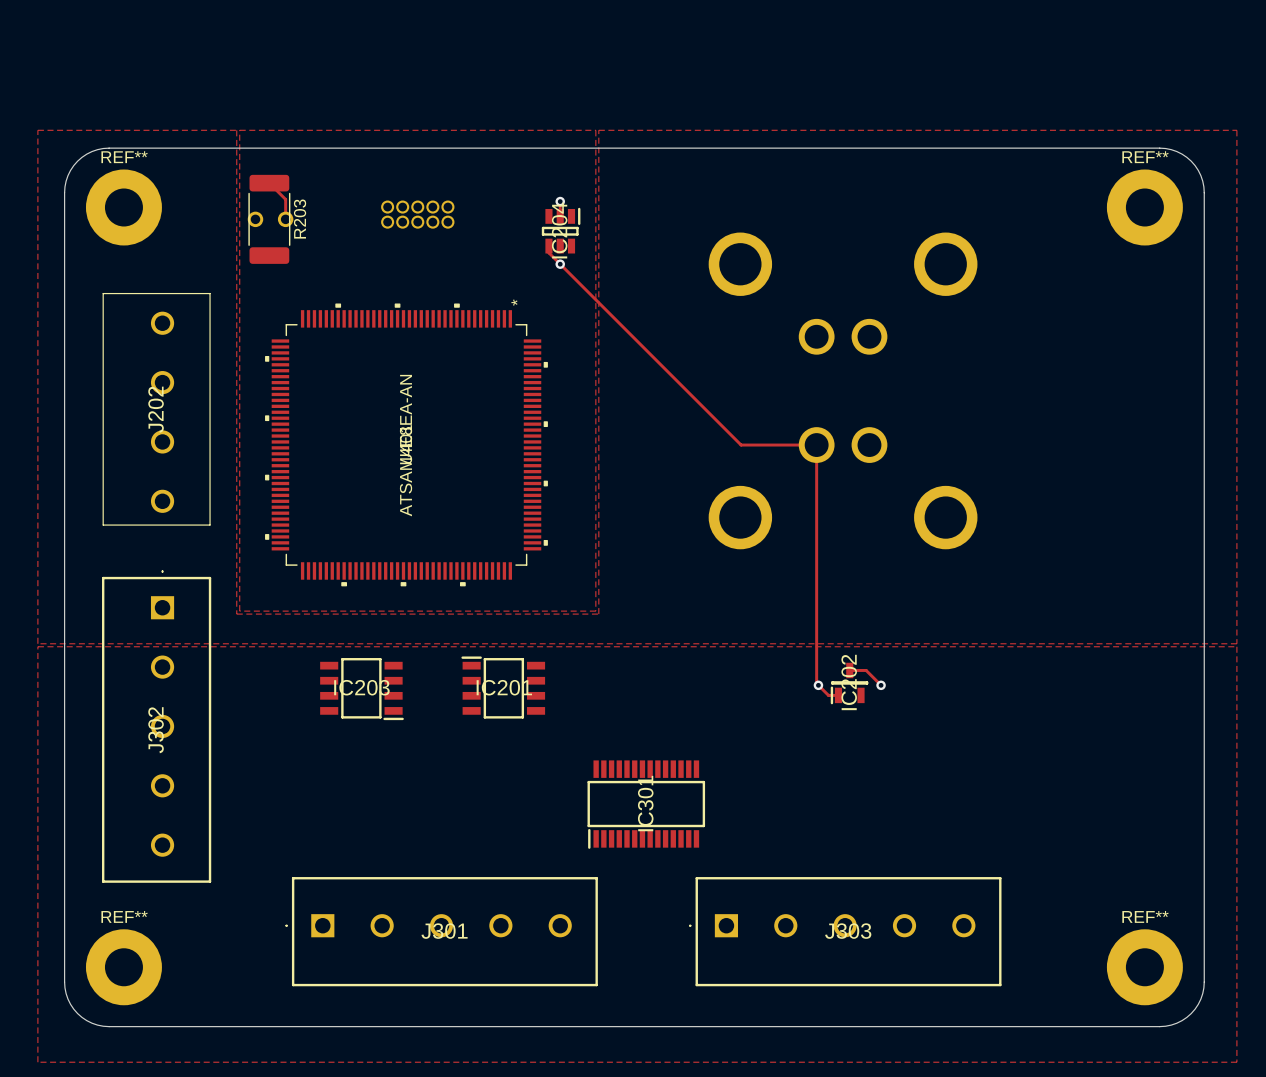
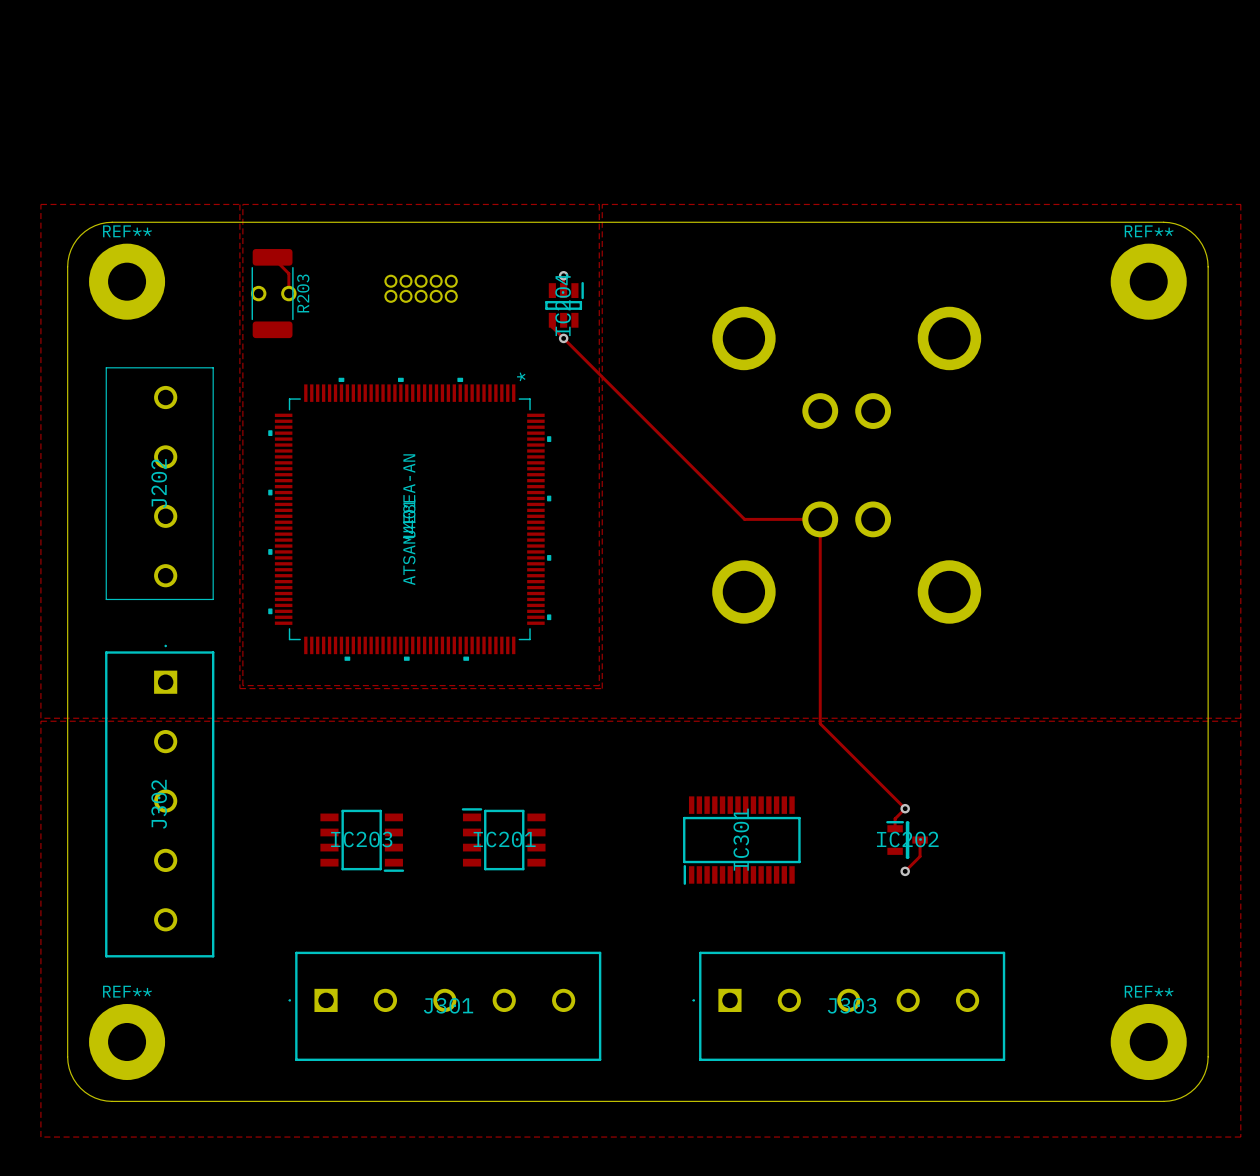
track: (816, 649) (816, 683) (828, 695) (838, 695) -> (820, 723) (905, 808) (895, 818) (895, 828)
track: (849, 670) (866, 670) (881, 685) -> none
IC202 rotation: 0° (849, 683) -> 90° clockwise (906, 839)
IC202 position: (849, 683) -> (906, 839)
via: (818, 685) -> none
via: (881, 685) -> none
IC201 position: (503, 687) -> (503, 839)
IC203 position: (361, 689) -> (362, 840)
via: none -> (905, 808)
track: none -> (920, 840) (920, 856) (905, 871)
via: none -> (905, 871)
IC301 position: (646, 804) -> (741, 840)

